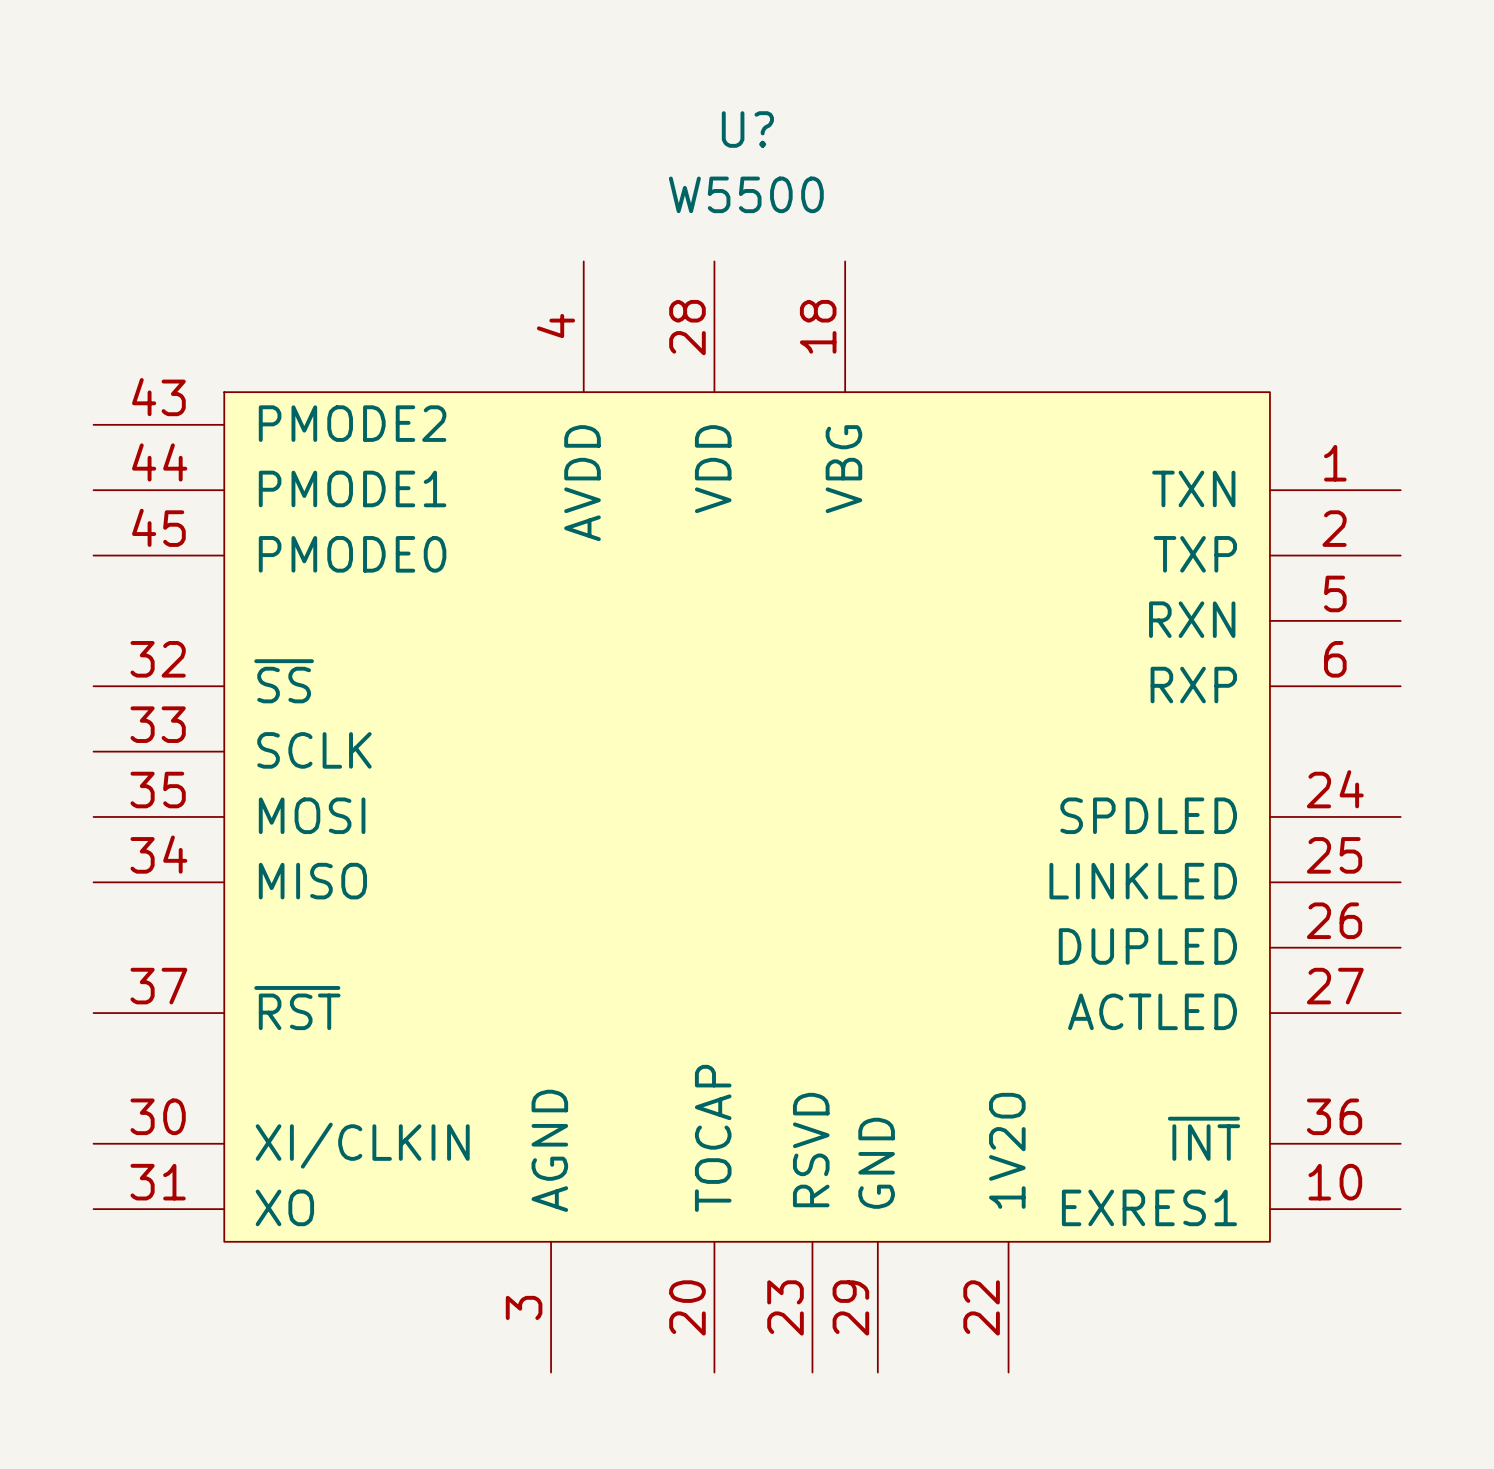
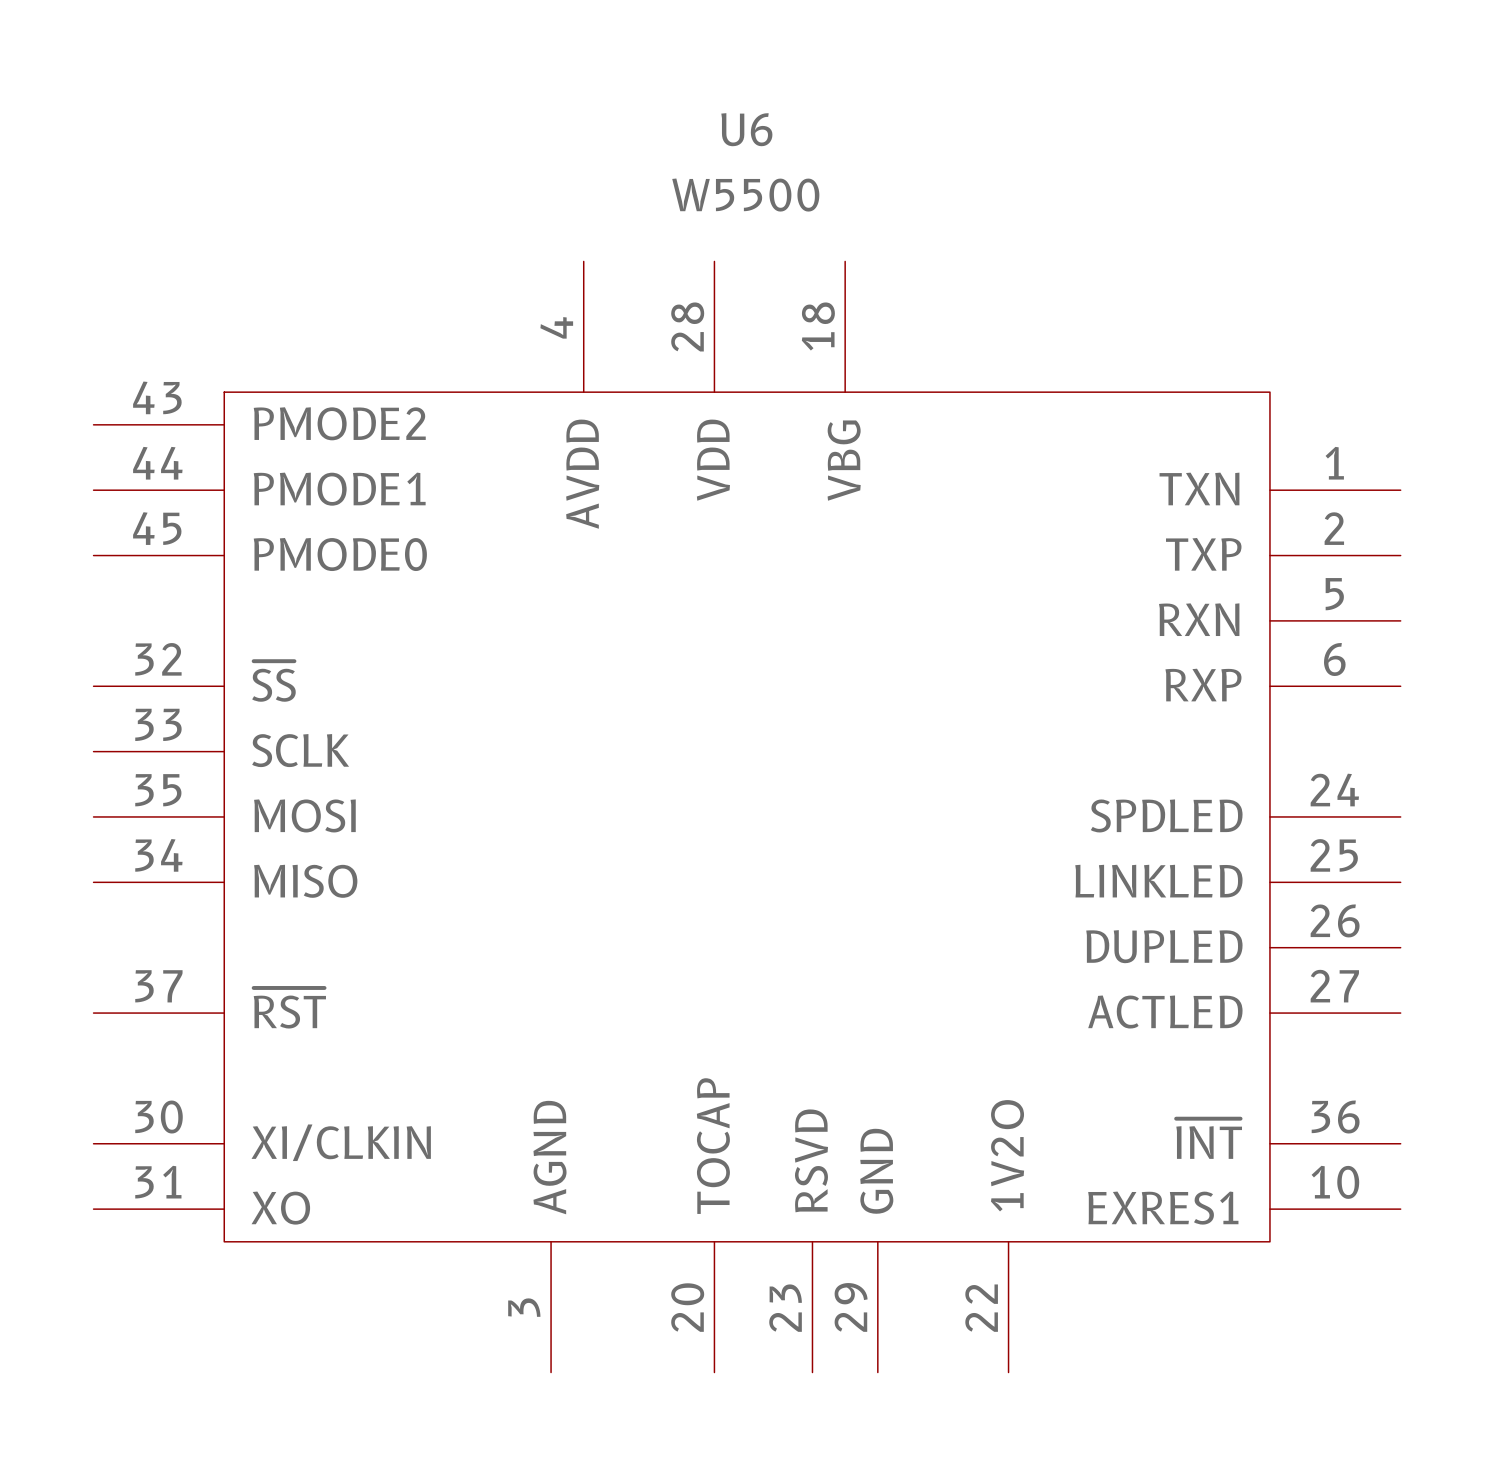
U? name: U? (747, 129) -> U6 (746, 129)

